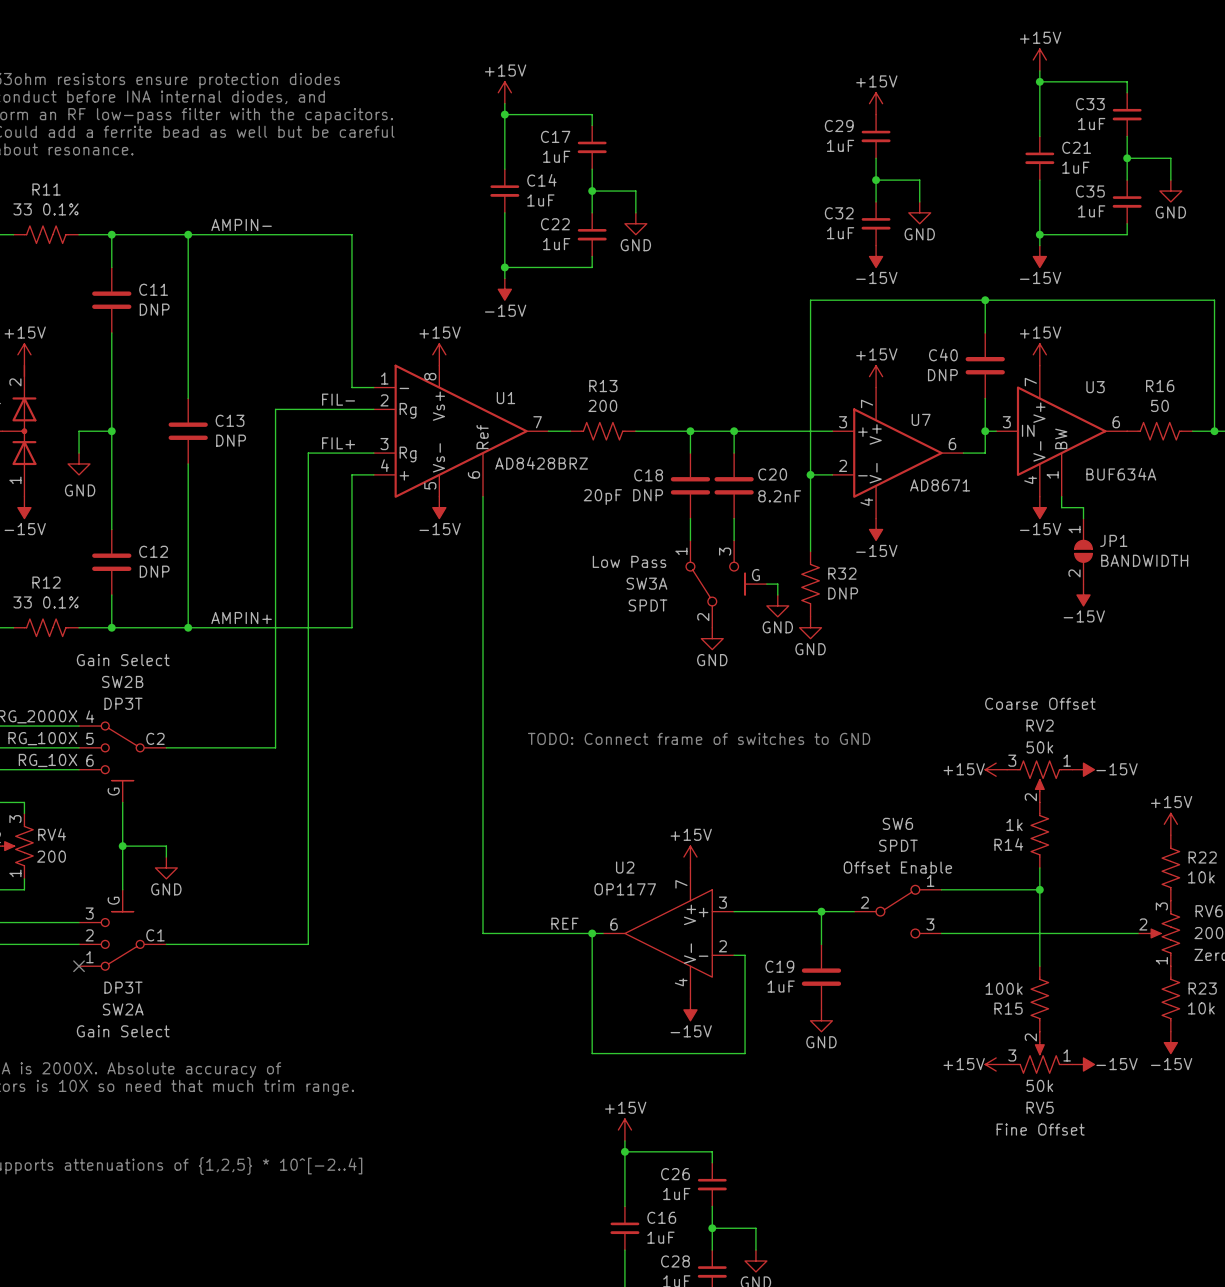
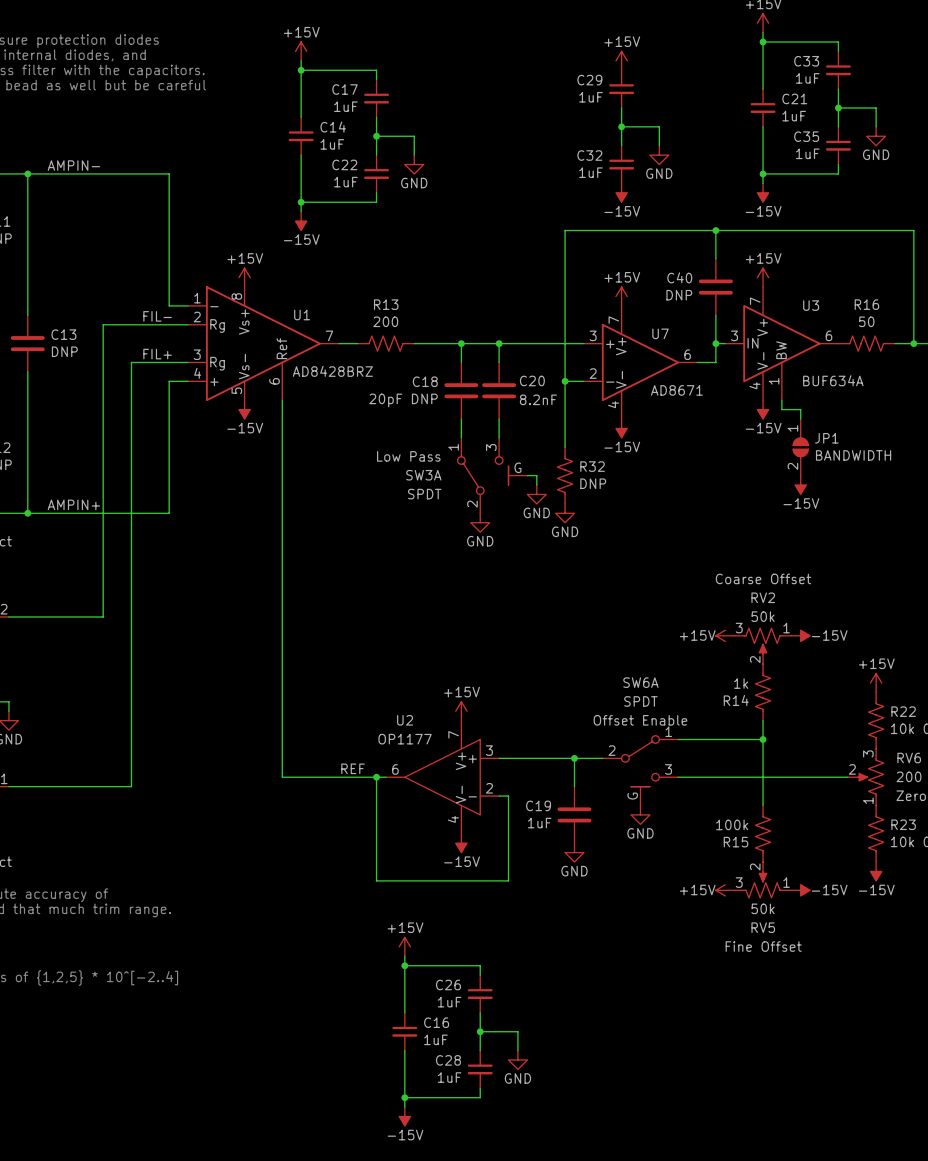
text: TODO: Connect frame of switches to GND (699, 738) -> none
SW6: SPDT (897, 911) -> none
SW6A: none -> SPDT (640, 770)
power symbol: none -> GND (640, 814)

